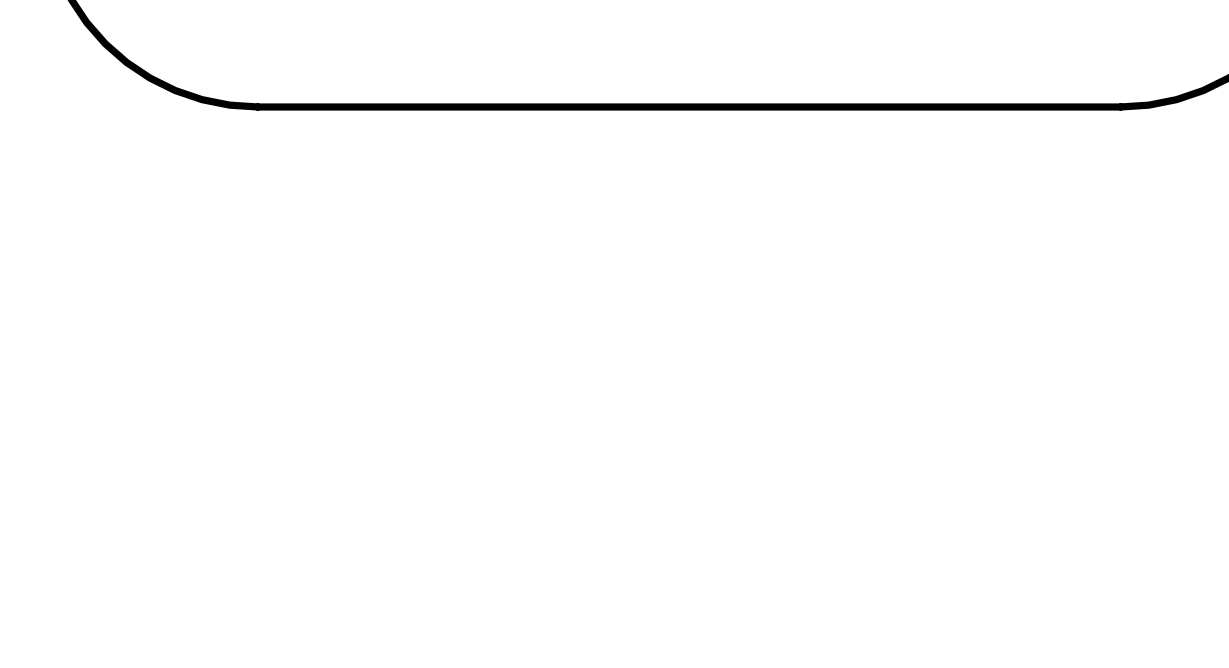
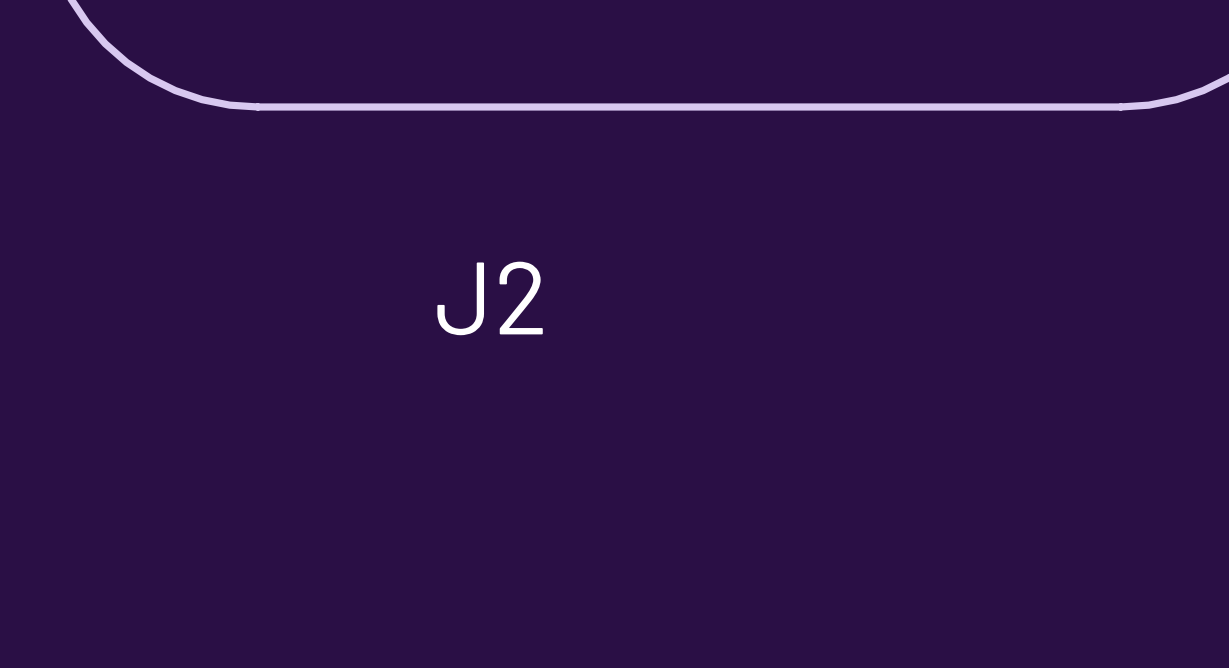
J2: none -> (490, 298)

